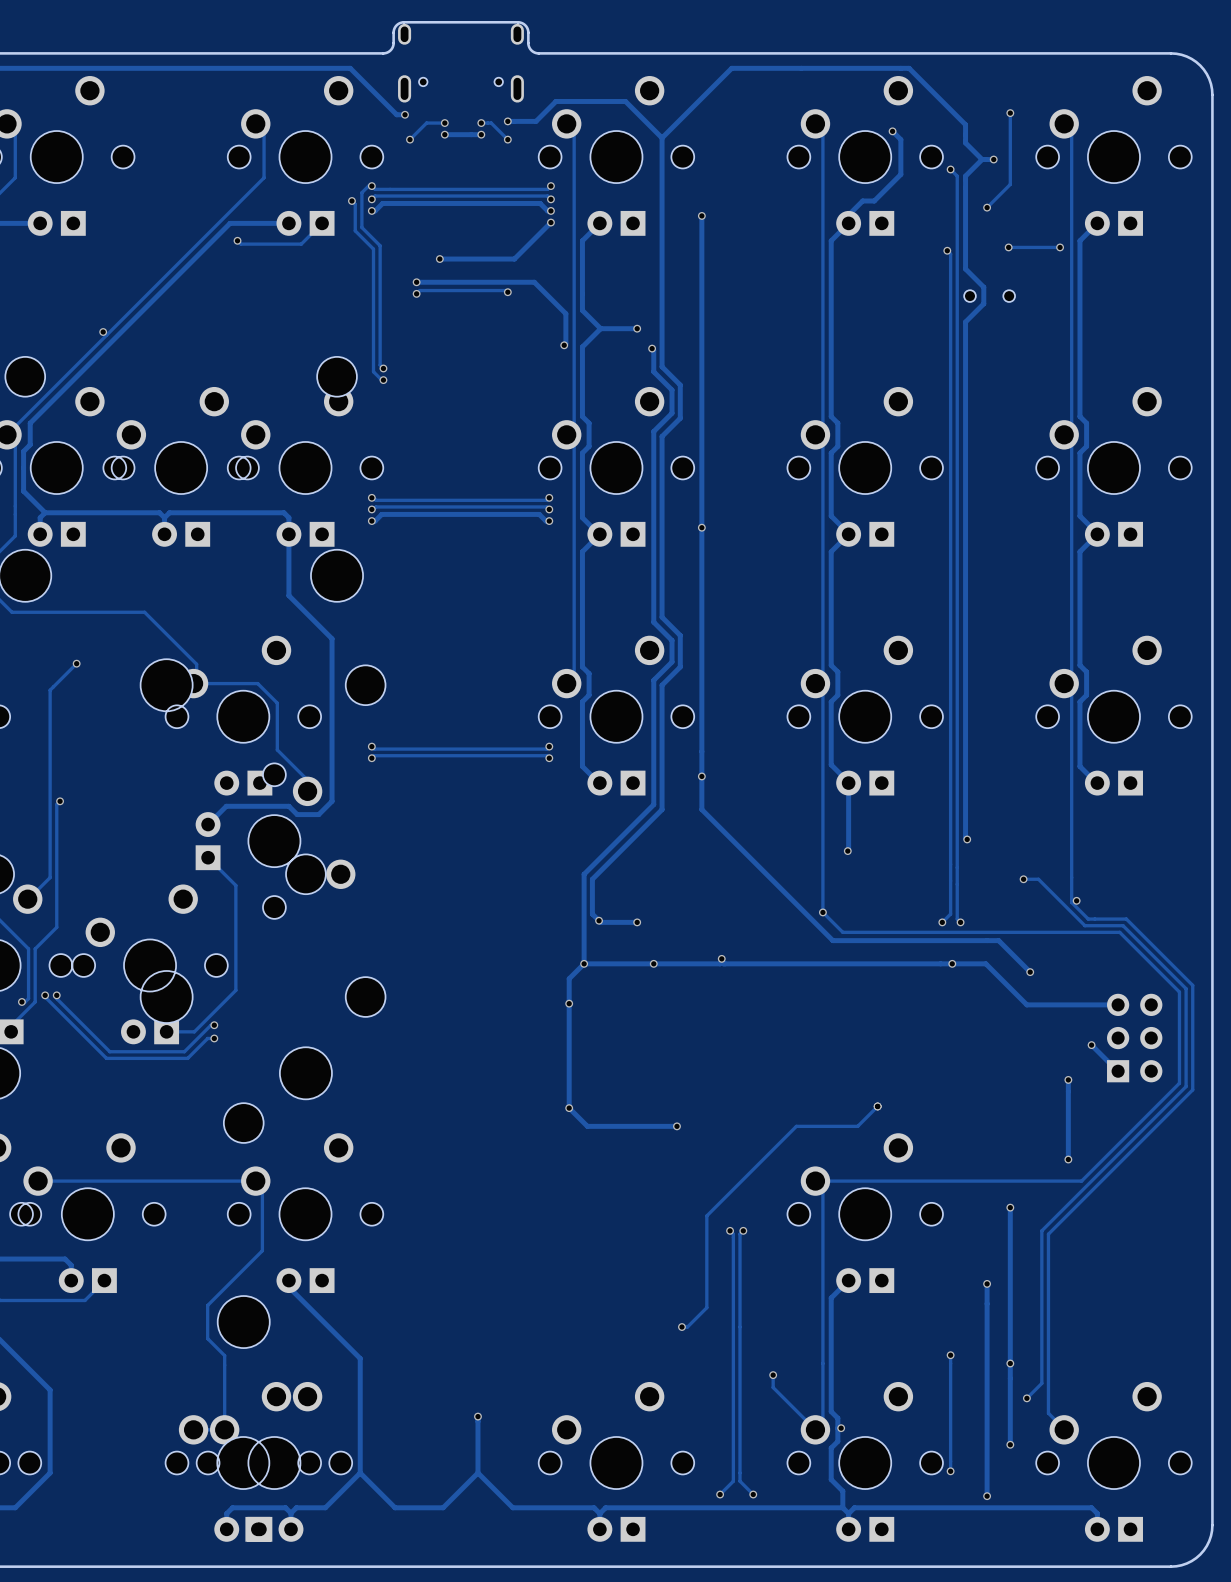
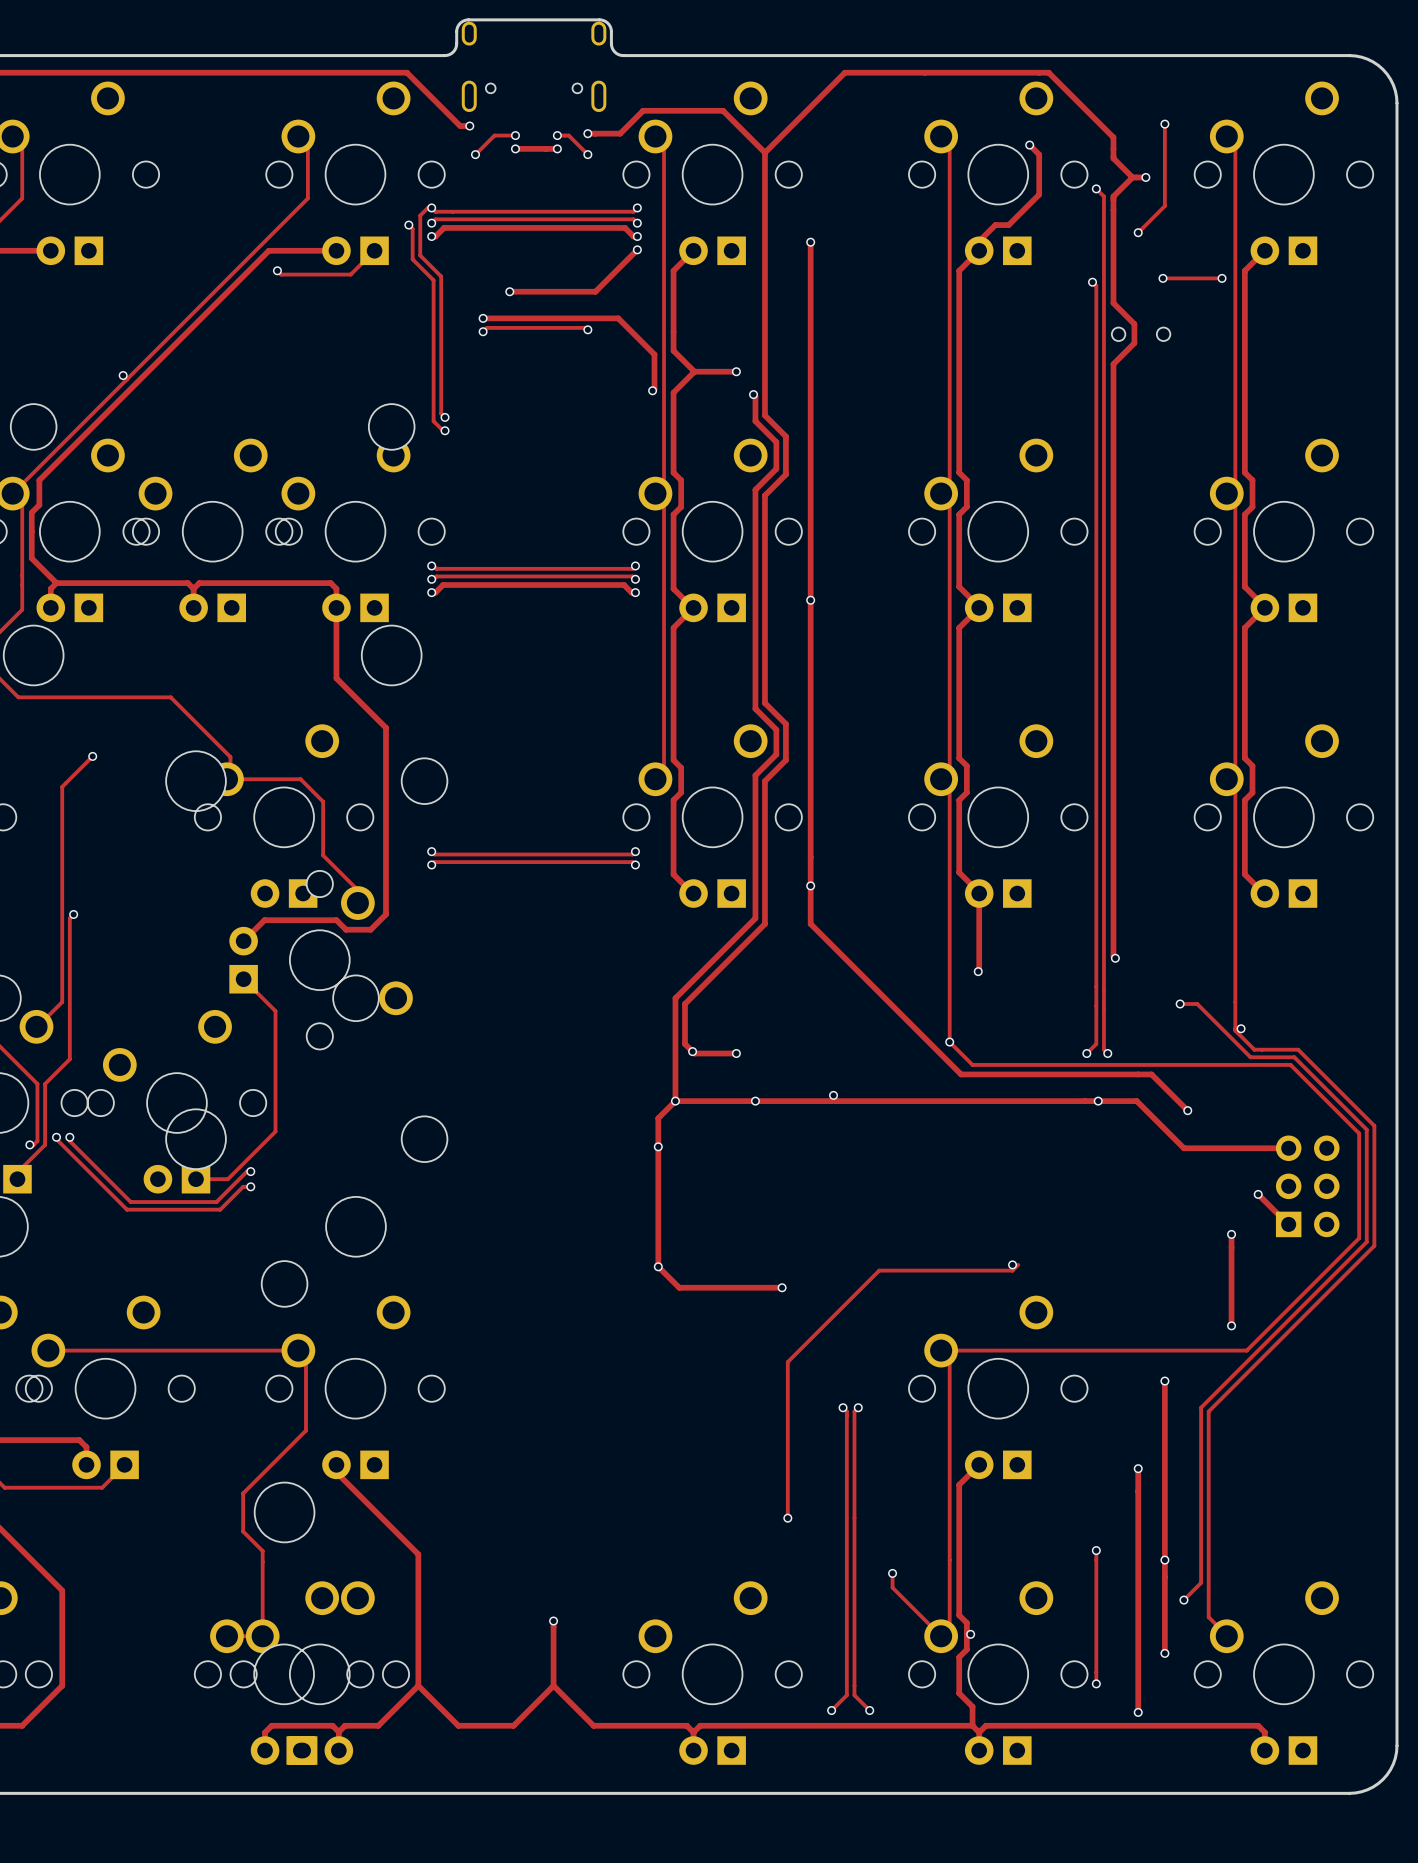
track: (877, 1106) (857, 1126) (796, 1126) (706, 1215) (706, 1307) (687, 1327) (681, 1327) -> (1018, 1264) (1012, 1270) (879, 1270) (787, 1362) (787, 1518)

